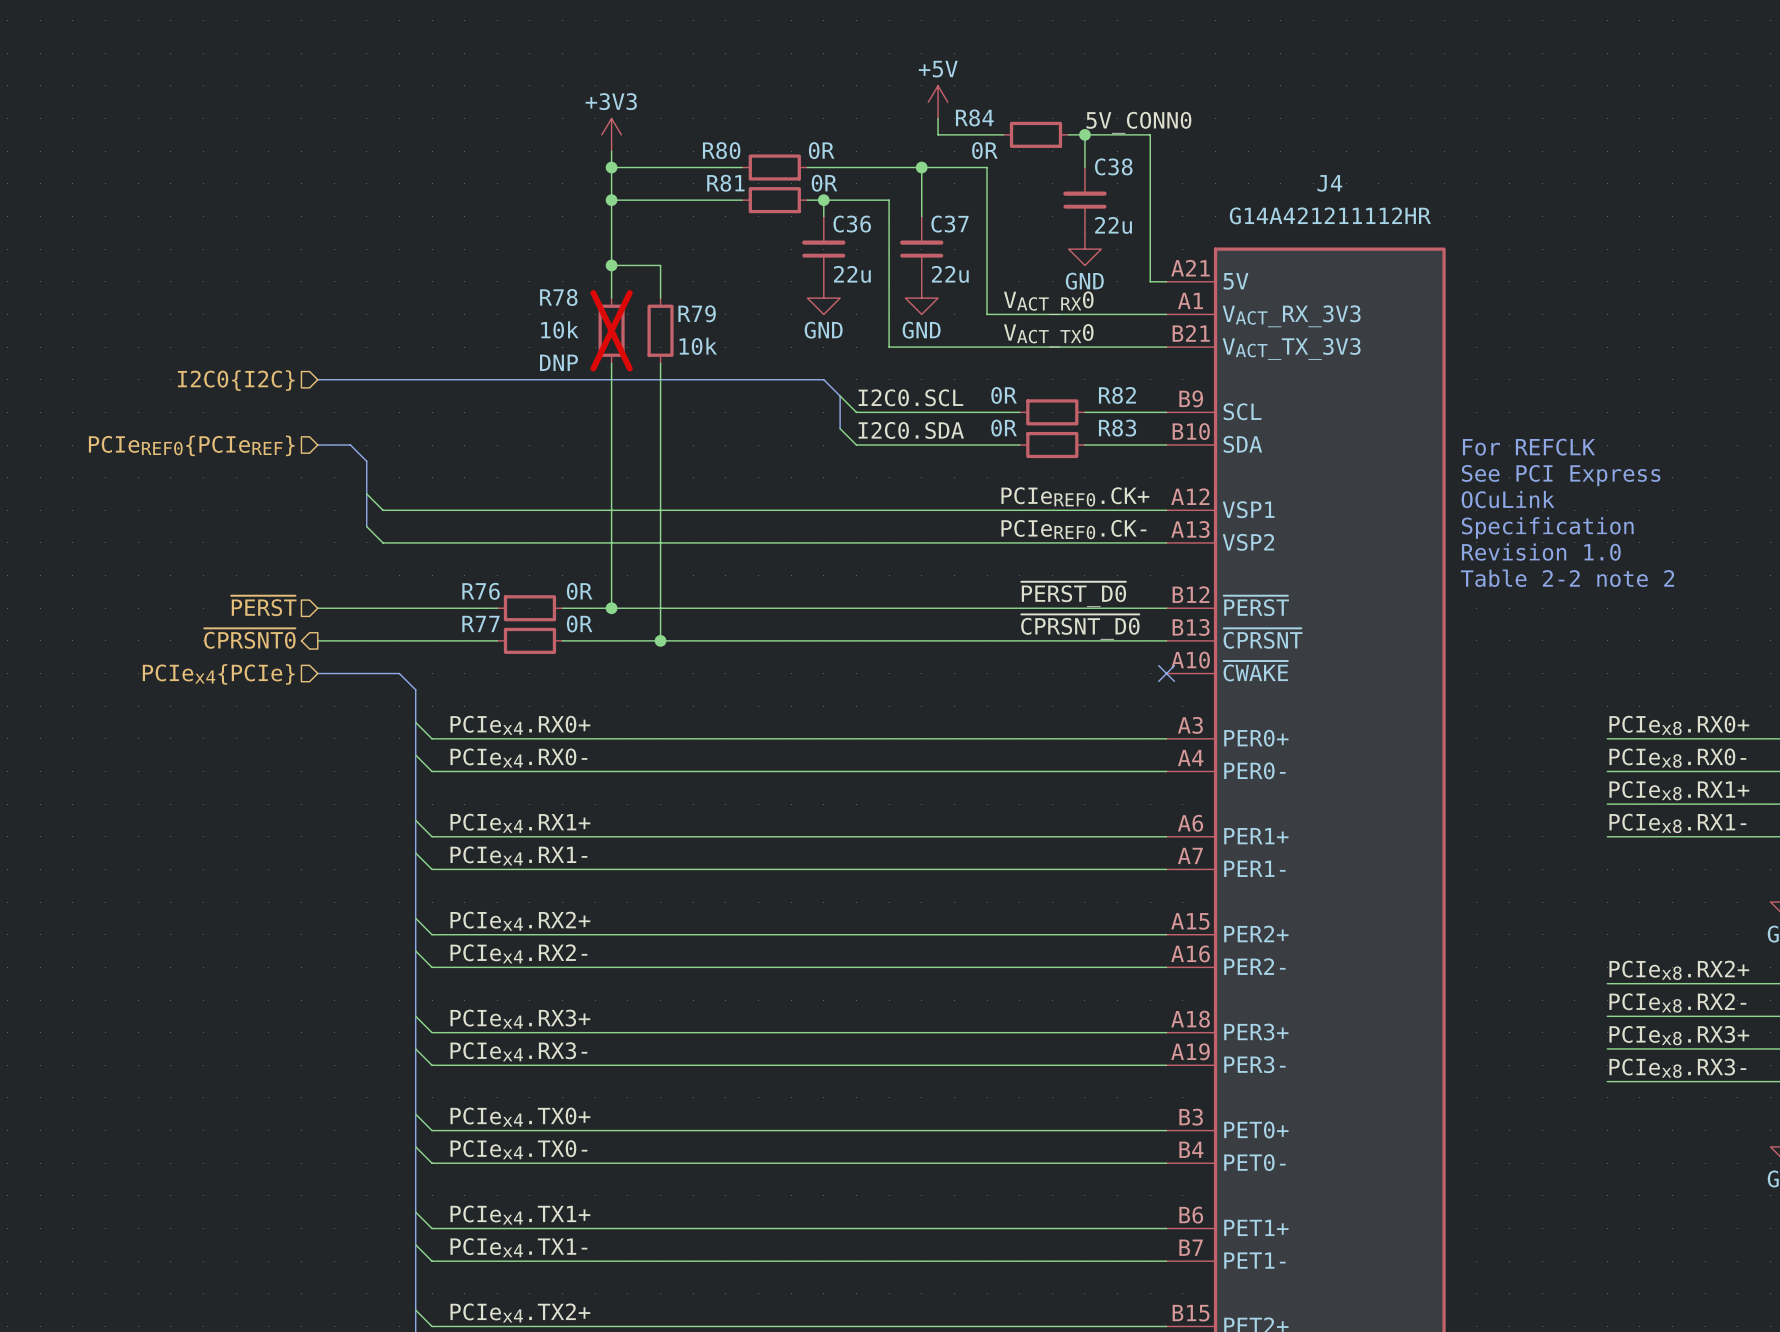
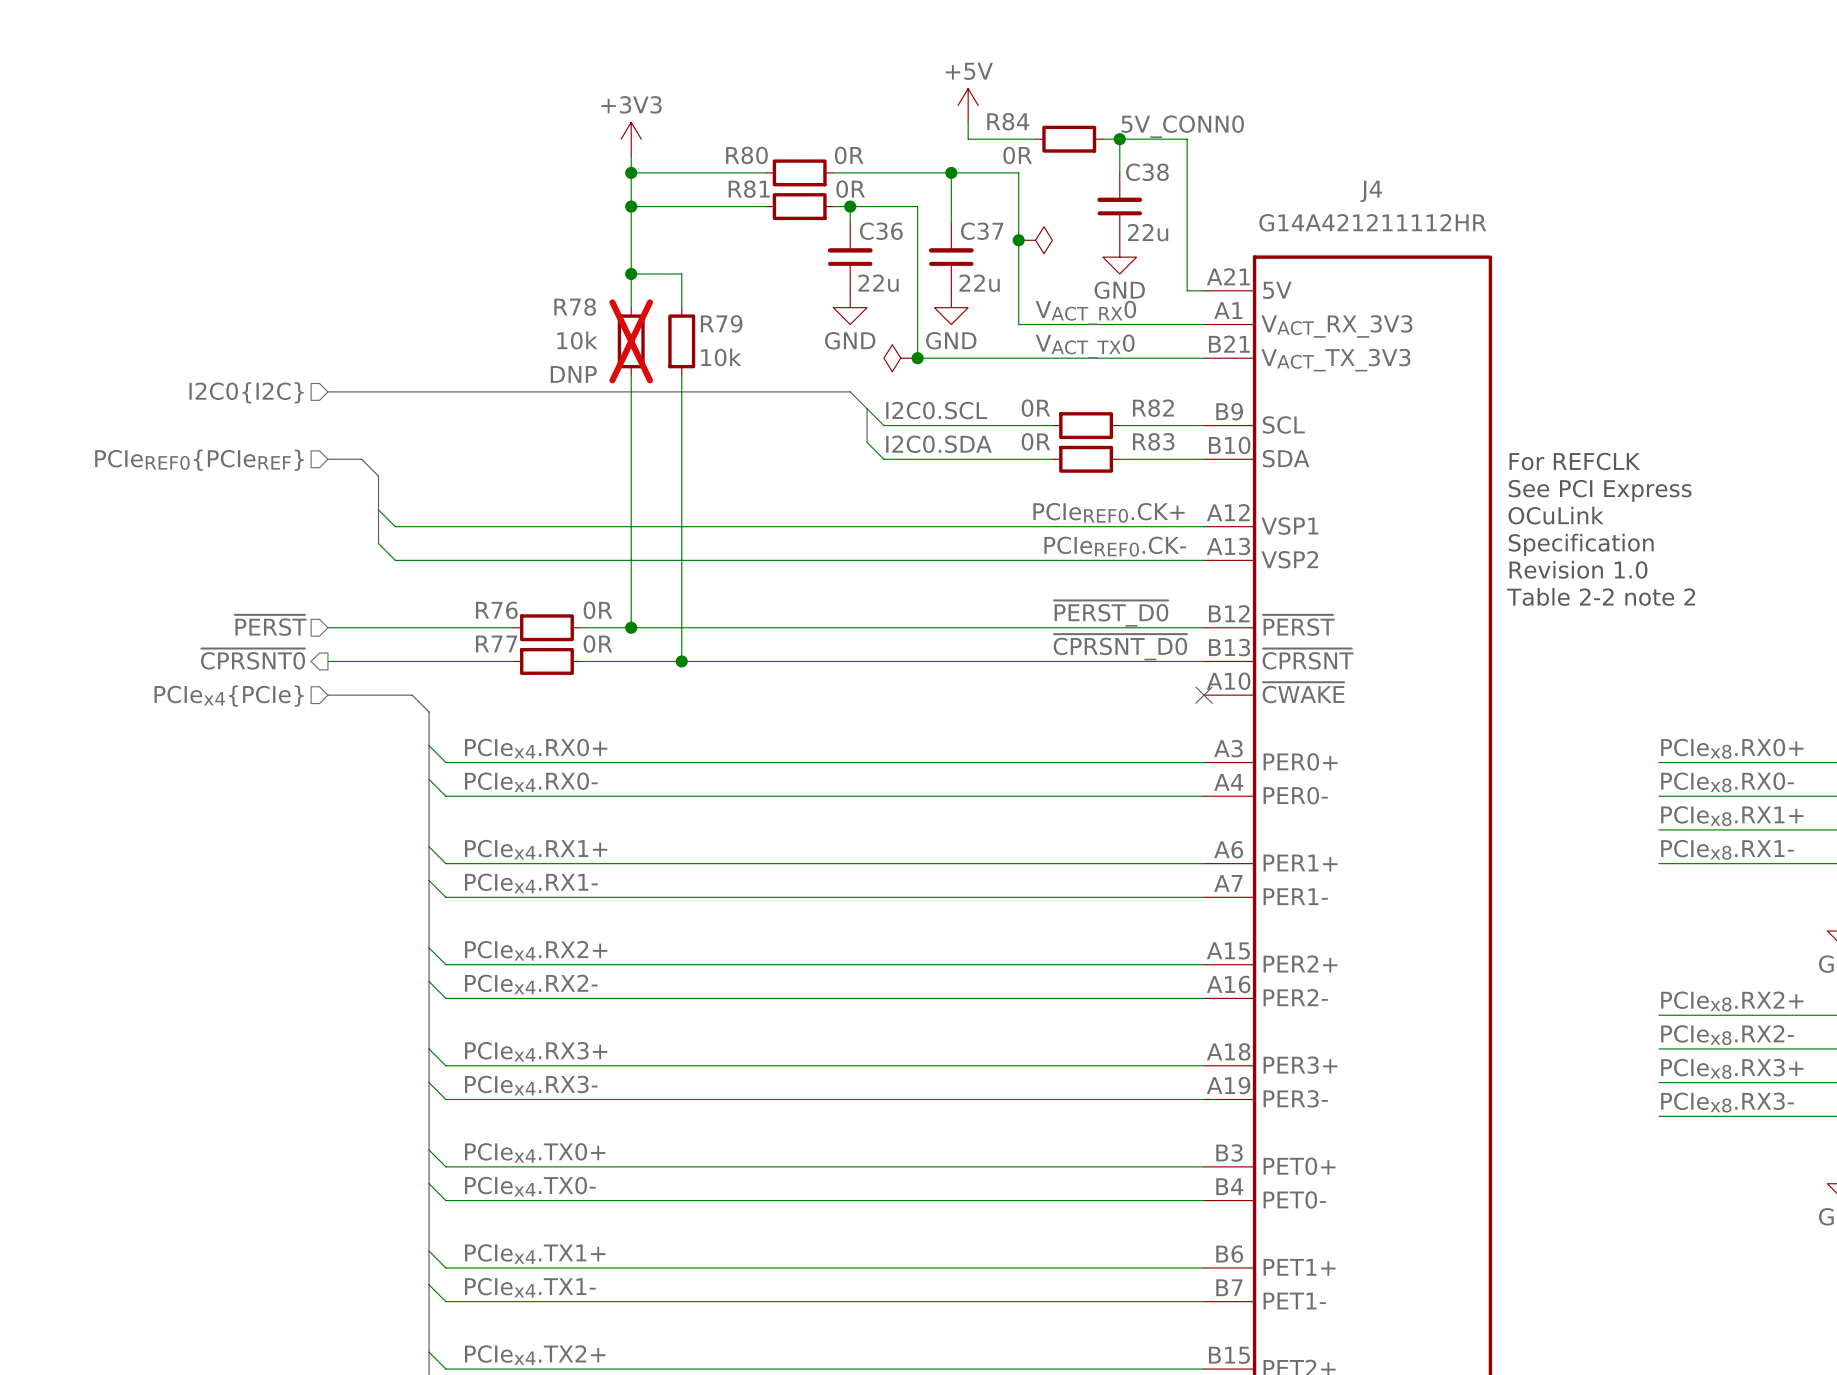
junction: none -> (1018, 240)
power symbol: none -> (1035, 240)
power symbol: none -> (900, 358)
junction: none -> (917, 358)

